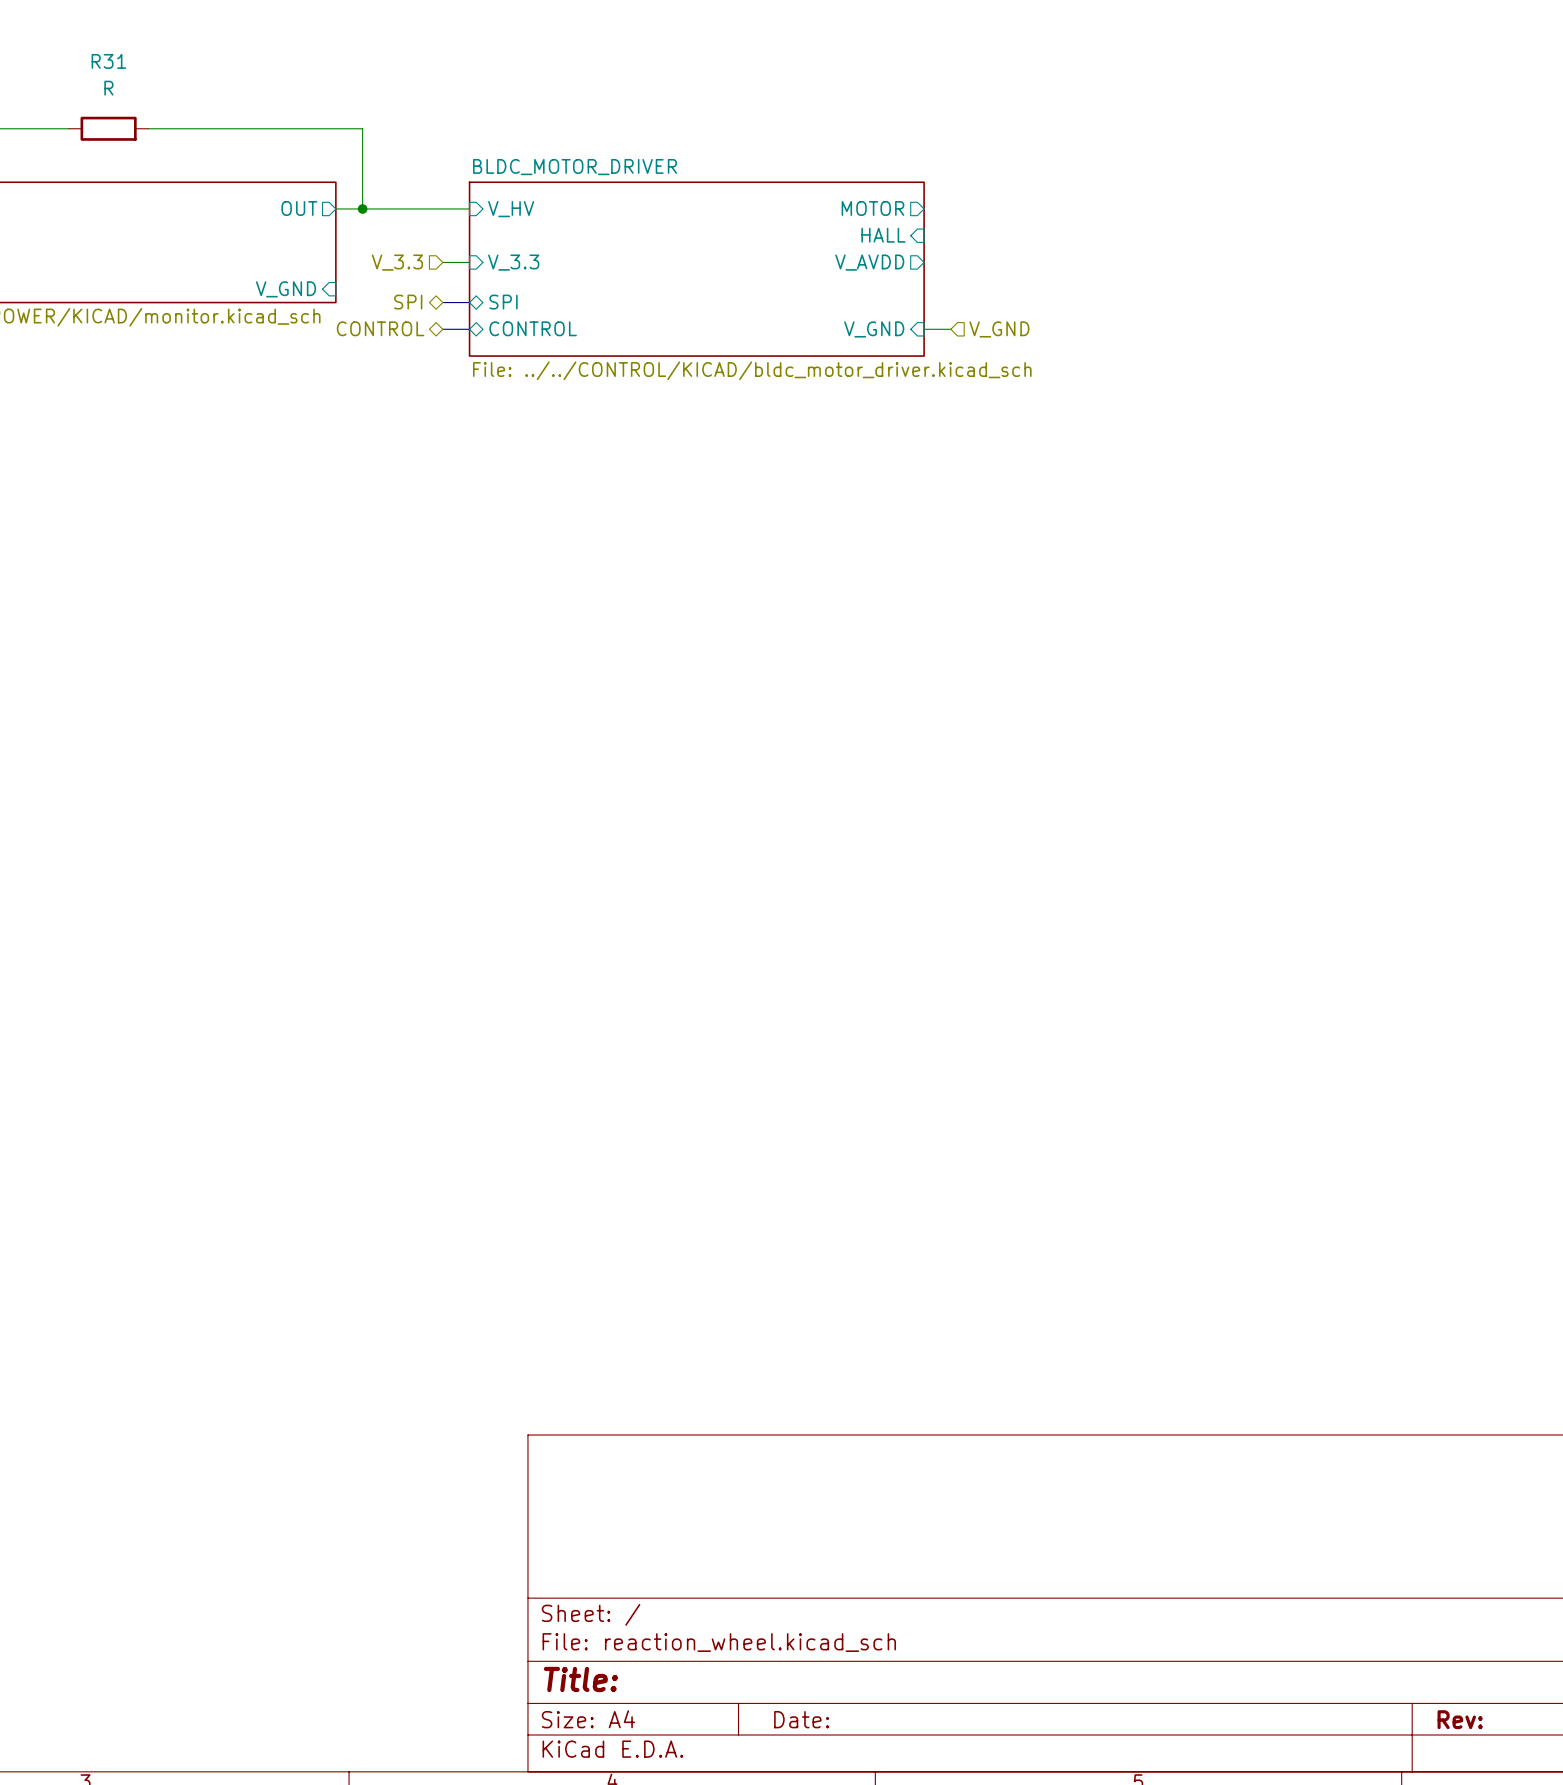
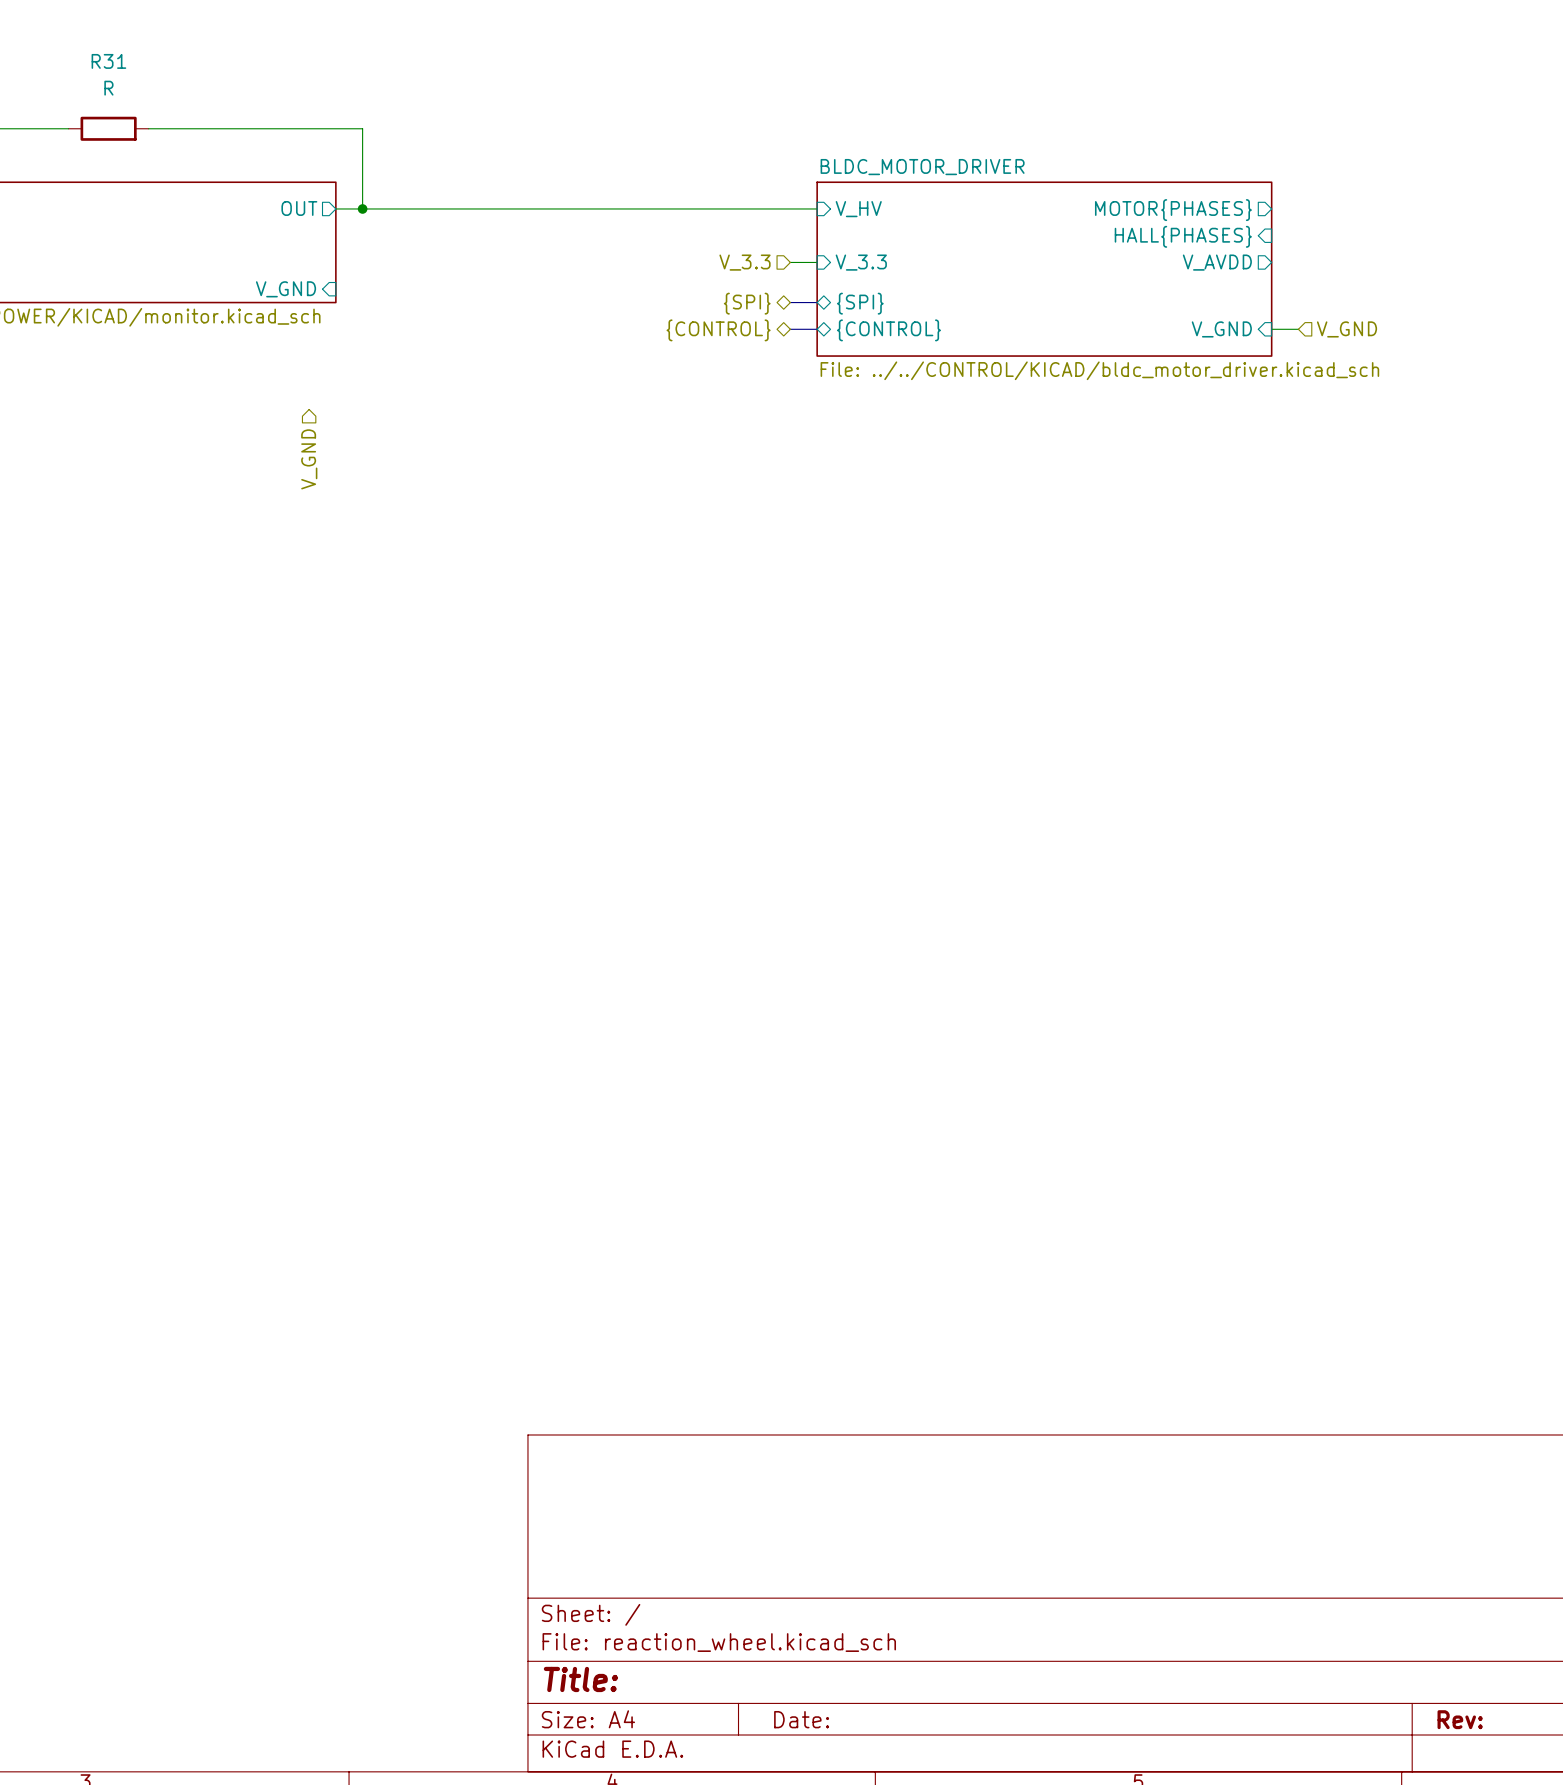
wire: none -> (469, 208) (817, 208)
sheet pin: MOTOR (872, 208) -> none
sheet pin: V_HV (511, 209) -> none
sheet pin: none -> V_HV (858, 209)
sheet pin: none -> MOTOR{PHASES} (1173, 210)
sheet pin: HALL (883, 235) -> none
sheet pin: none -> HALL{PHASES} (1183, 236)
hierarchical label: V_3.3 (397, 262) -> none
wire: (442, 262) (469, 262) -> none
sheet pin: V_3.3 (513, 262) -> none
hierarchical label: none -> V_3.3 (744, 262)
sheet pin: none -> V_3.3 (861, 262)
sheet pin: V_AVDD (869, 262) -> none
sheet pin: none -> V_AVDD (1217, 262)
sheet BLDC_MOTOR_DRIVER: File: ../../CONTROL/KICAD/bldc_motor_driver.kicad_sch (696, 269) -> none
sheet BLDC_MOTOR_DRIVER: none -> File: ../../CONTROL/KICAD/bldc_motor_driver.kicad_sch (1044, 269)
hierarchical label: SPI (408, 302) -> none
bus: (442, 302) (469, 302) -> none
sheet pin: SPI (503, 302) -> none
bus: none -> (790, 302) (817, 302)
hierarchical label: none -> {SPI} (747, 303)
sheet pin: none -> {SPI} (860, 303)
hierarchical label: CONTROL (380, 328) -> none
sheet pin: CONTROL (533, 328) -> none
bus: (442, 329) (469, 329) -> none
bus: none -> (790, 329) (817, 329)
sheet pin: V_GND (874, 329) -> none
wire: (924, 329) (950, 329) -> (790, 262) (817, 262)
hierarchical label: V_GND (999, 329) -> none
sheet pin: none -> V_GND (1221, 329)
wire: none -> (1271, 329) (1298, 329)
hierarchical label: none -> V_GND (1347, 329)
hierarchical label: none -> {CONTROL} (718, 330)
sheet pin: none -> {CONTROL} (888, 330)
hierarchical label: none -> V_GND (309, 459)

